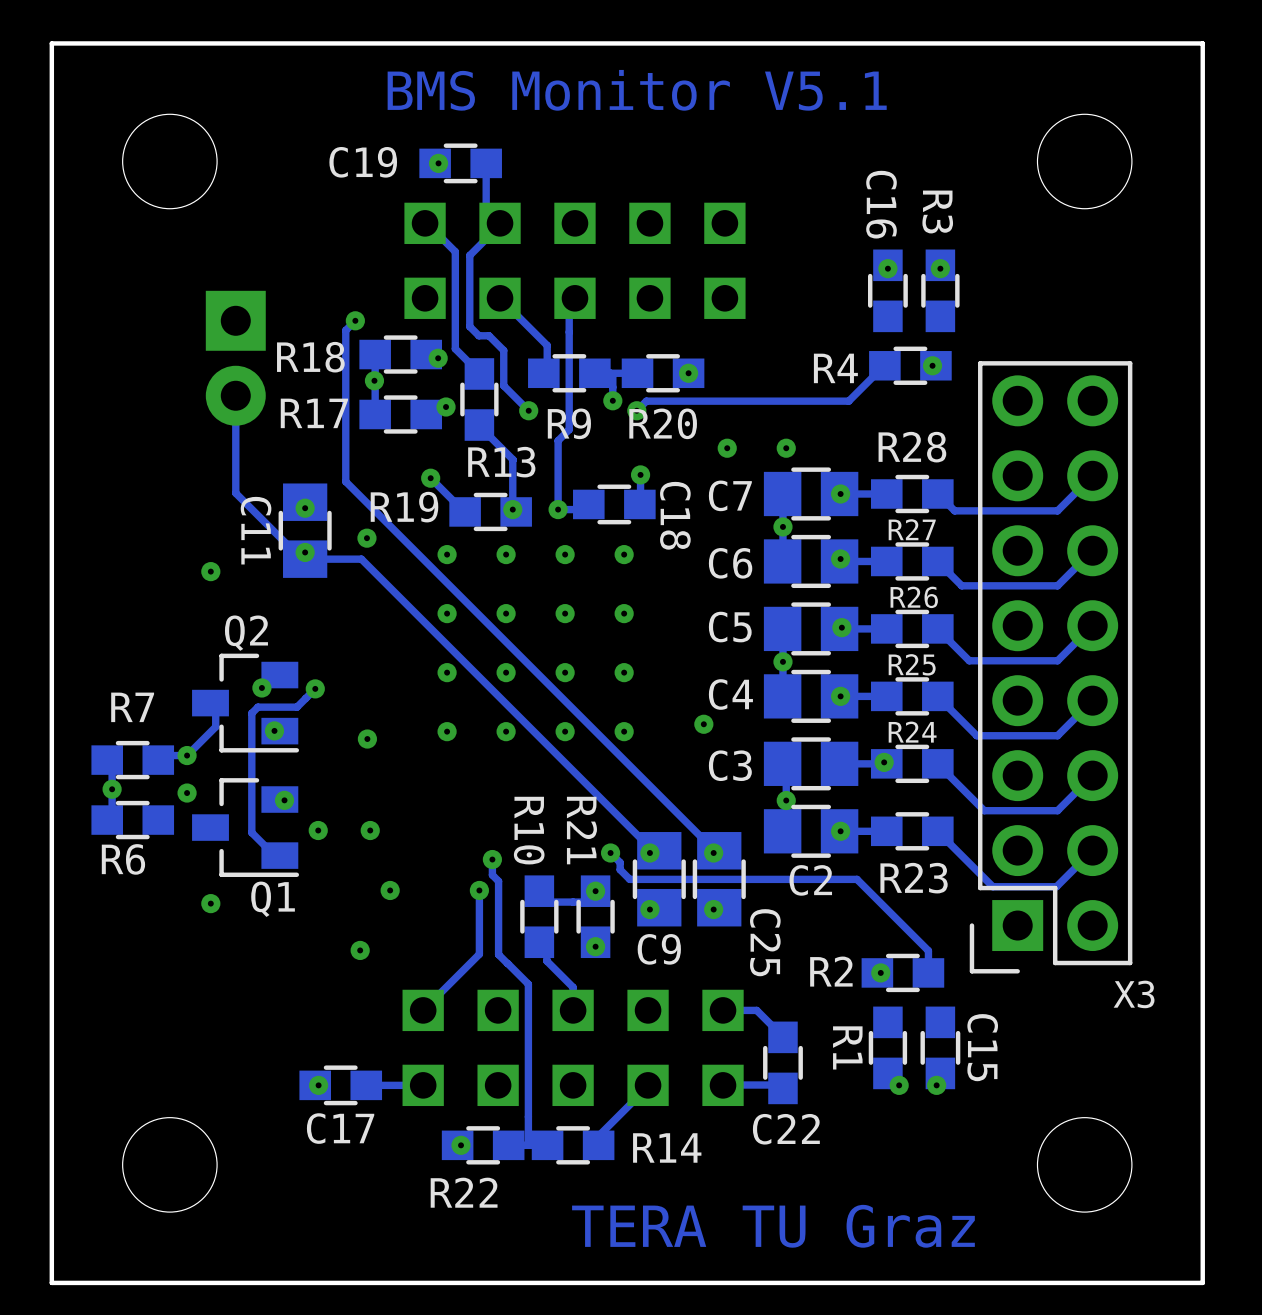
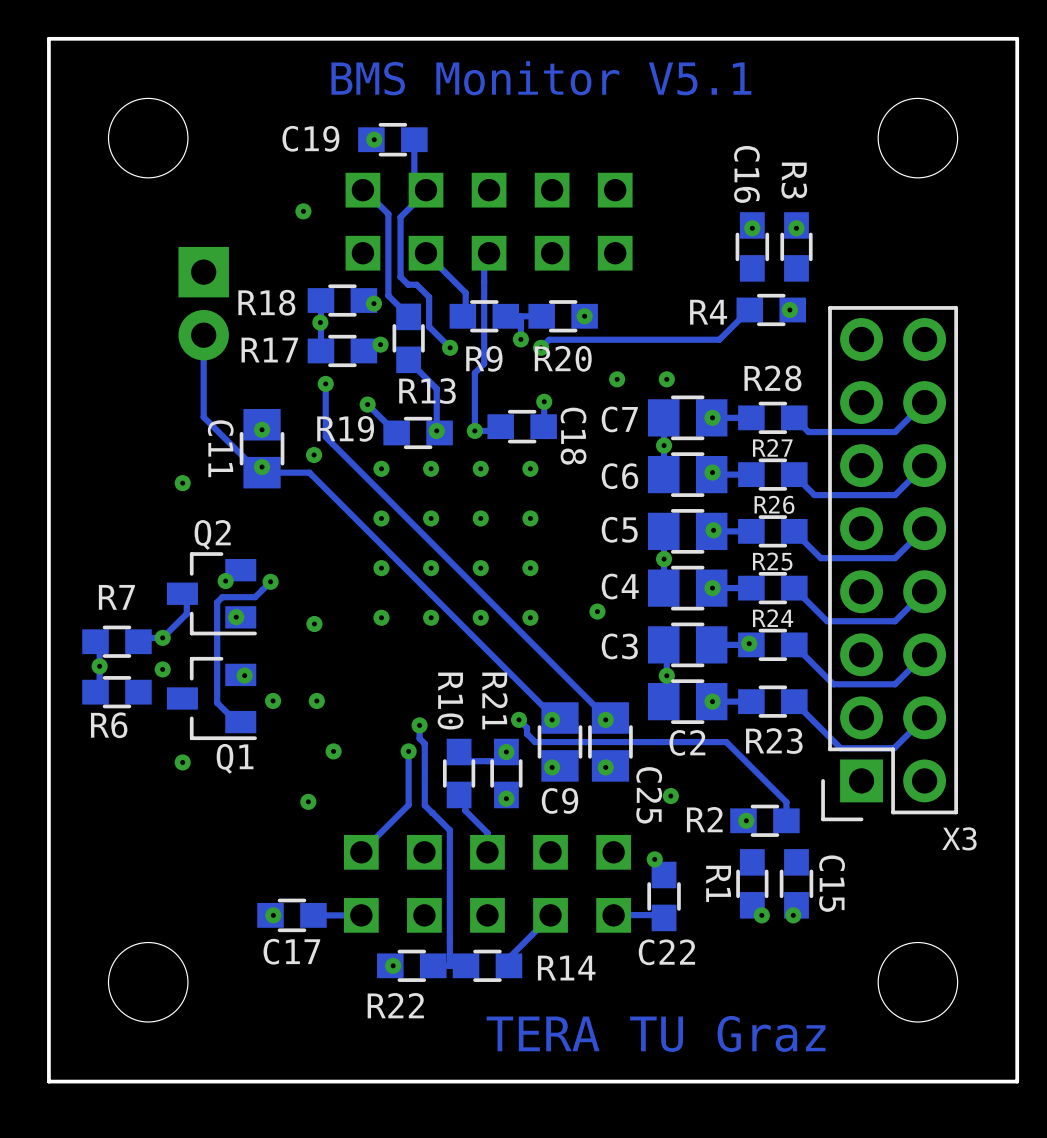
via: none -> (303, 211)
track: (355, 320) (345, 330) (345, 481) (380, 516) -> (325, 383) (325, 437)
via: (355, 320) -> none
via: none -> (325, 383)
via: none -> (670, 796)
track: (723, 1010) (756, 1010) (782, 1036) -> none
via: none -> (654, 859)

